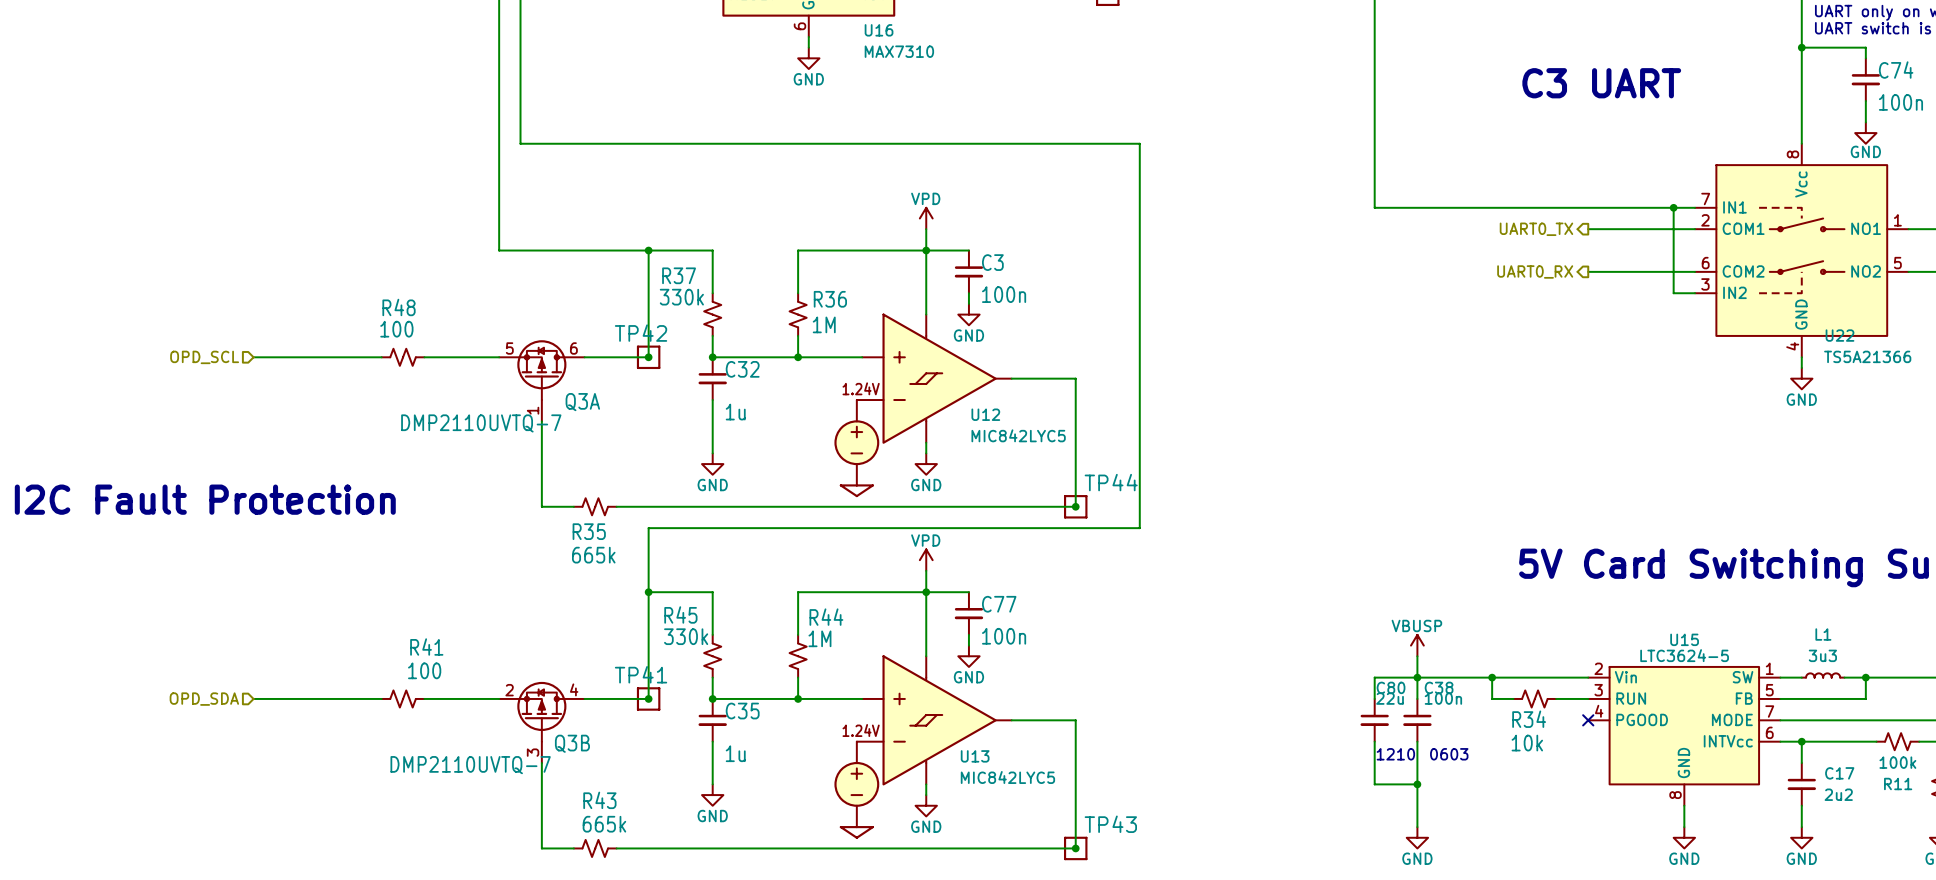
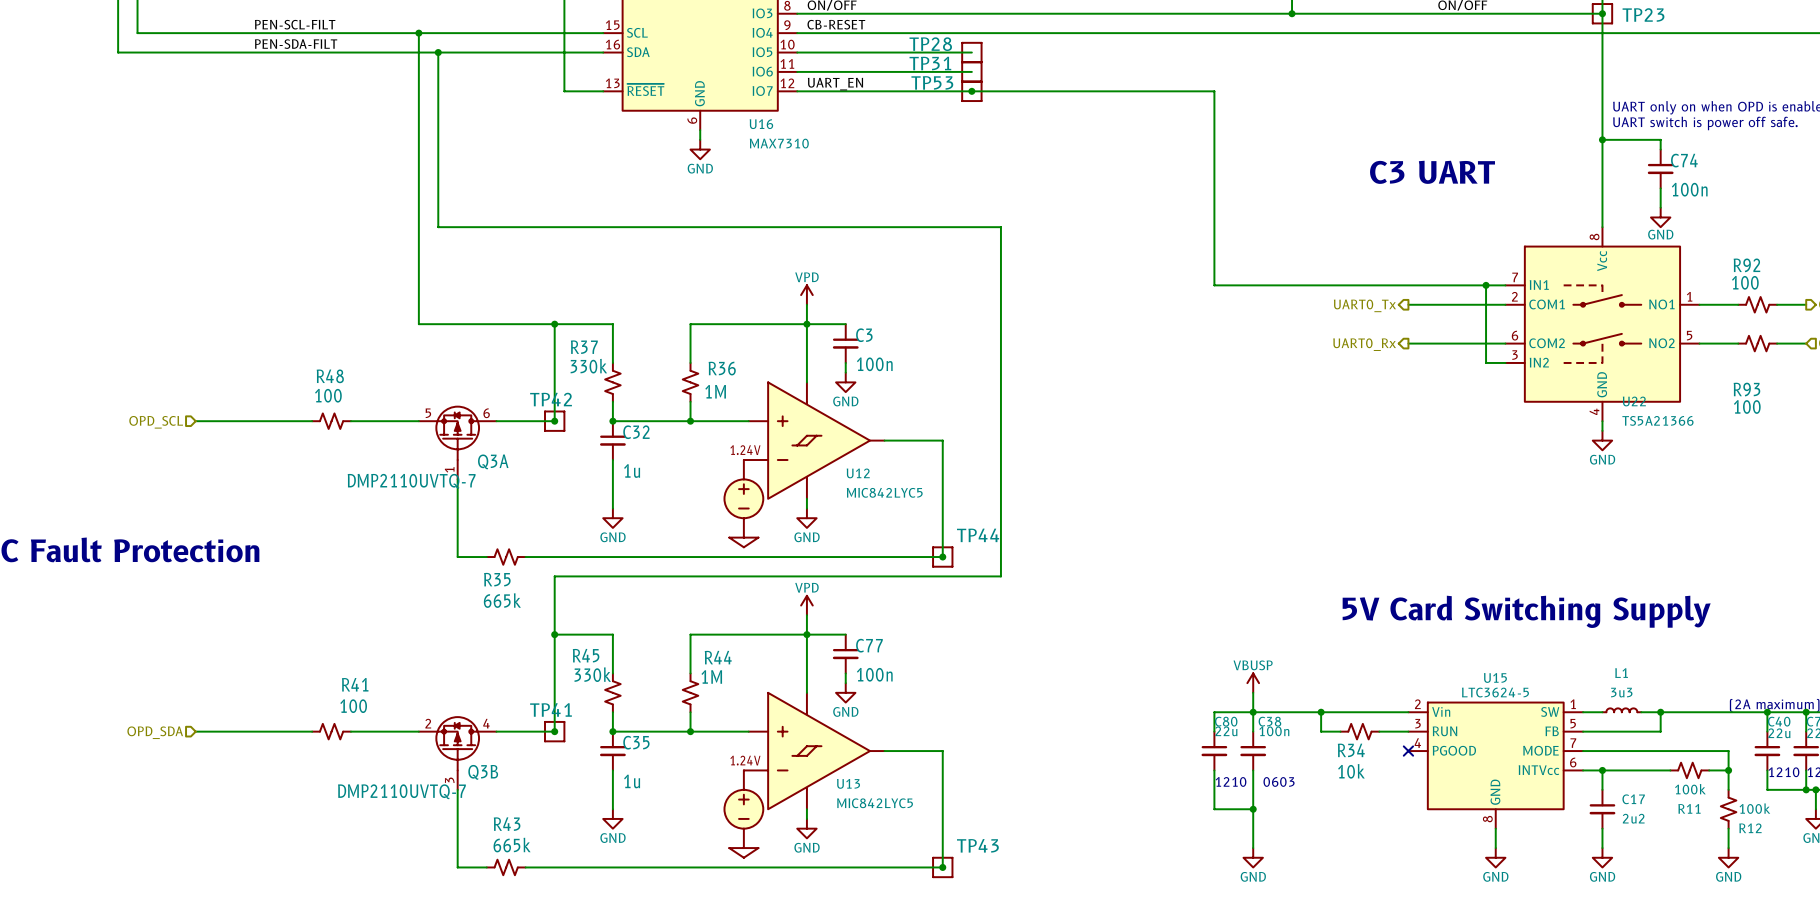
hierarchical label: UART0_TX (1536, 229) -> UART0_Tx (1364, 305)
hierarchical label: UART0_RX (1535, 271) -> UART0_Rx (1364, 344)

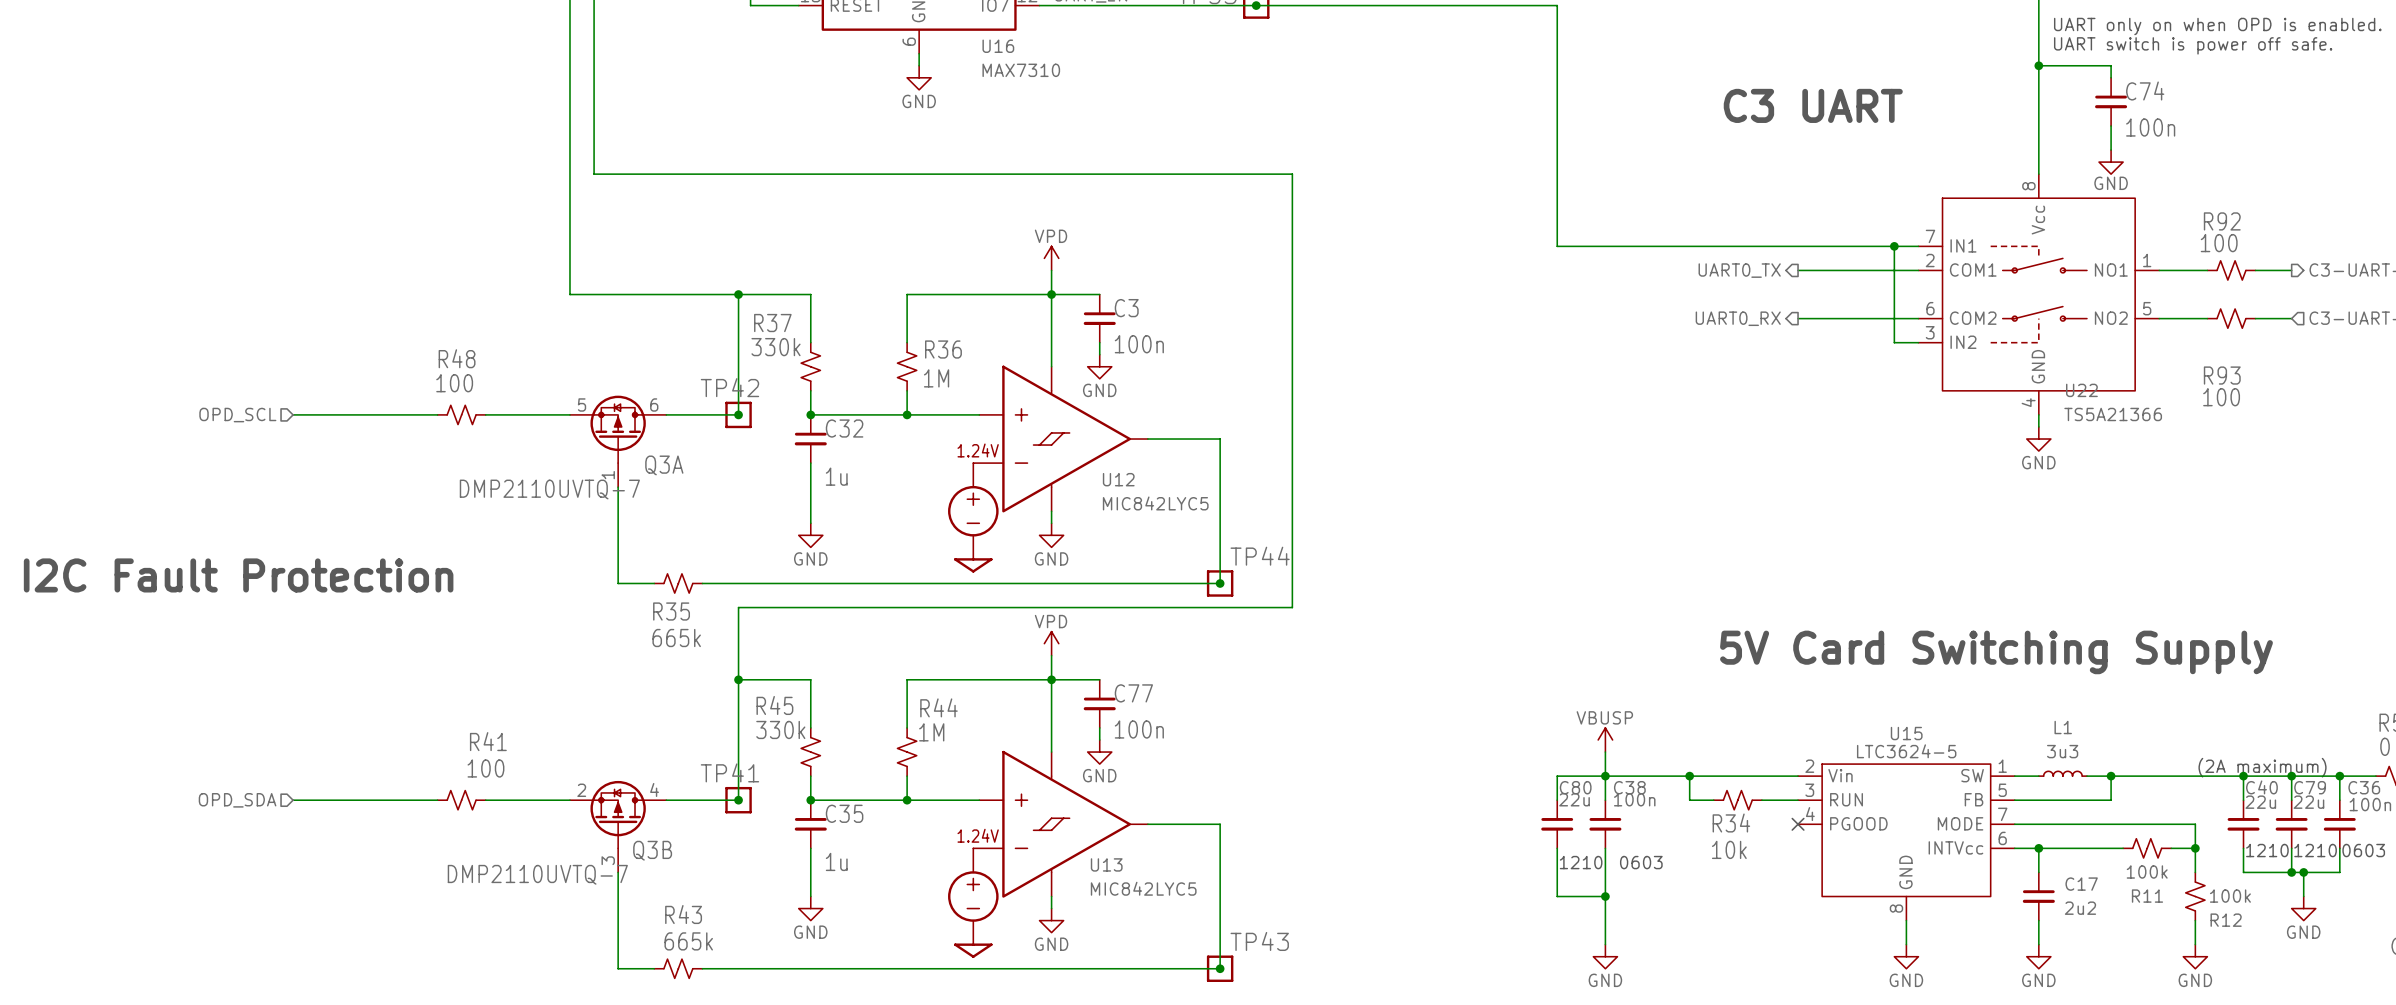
hierarchical label: UART0_Tx (1364, 305) -> UART0_TX (1739, 270)
hierarchical label: UART0_Rx (1364, 344) -> UART0_RX (1738, 318)

